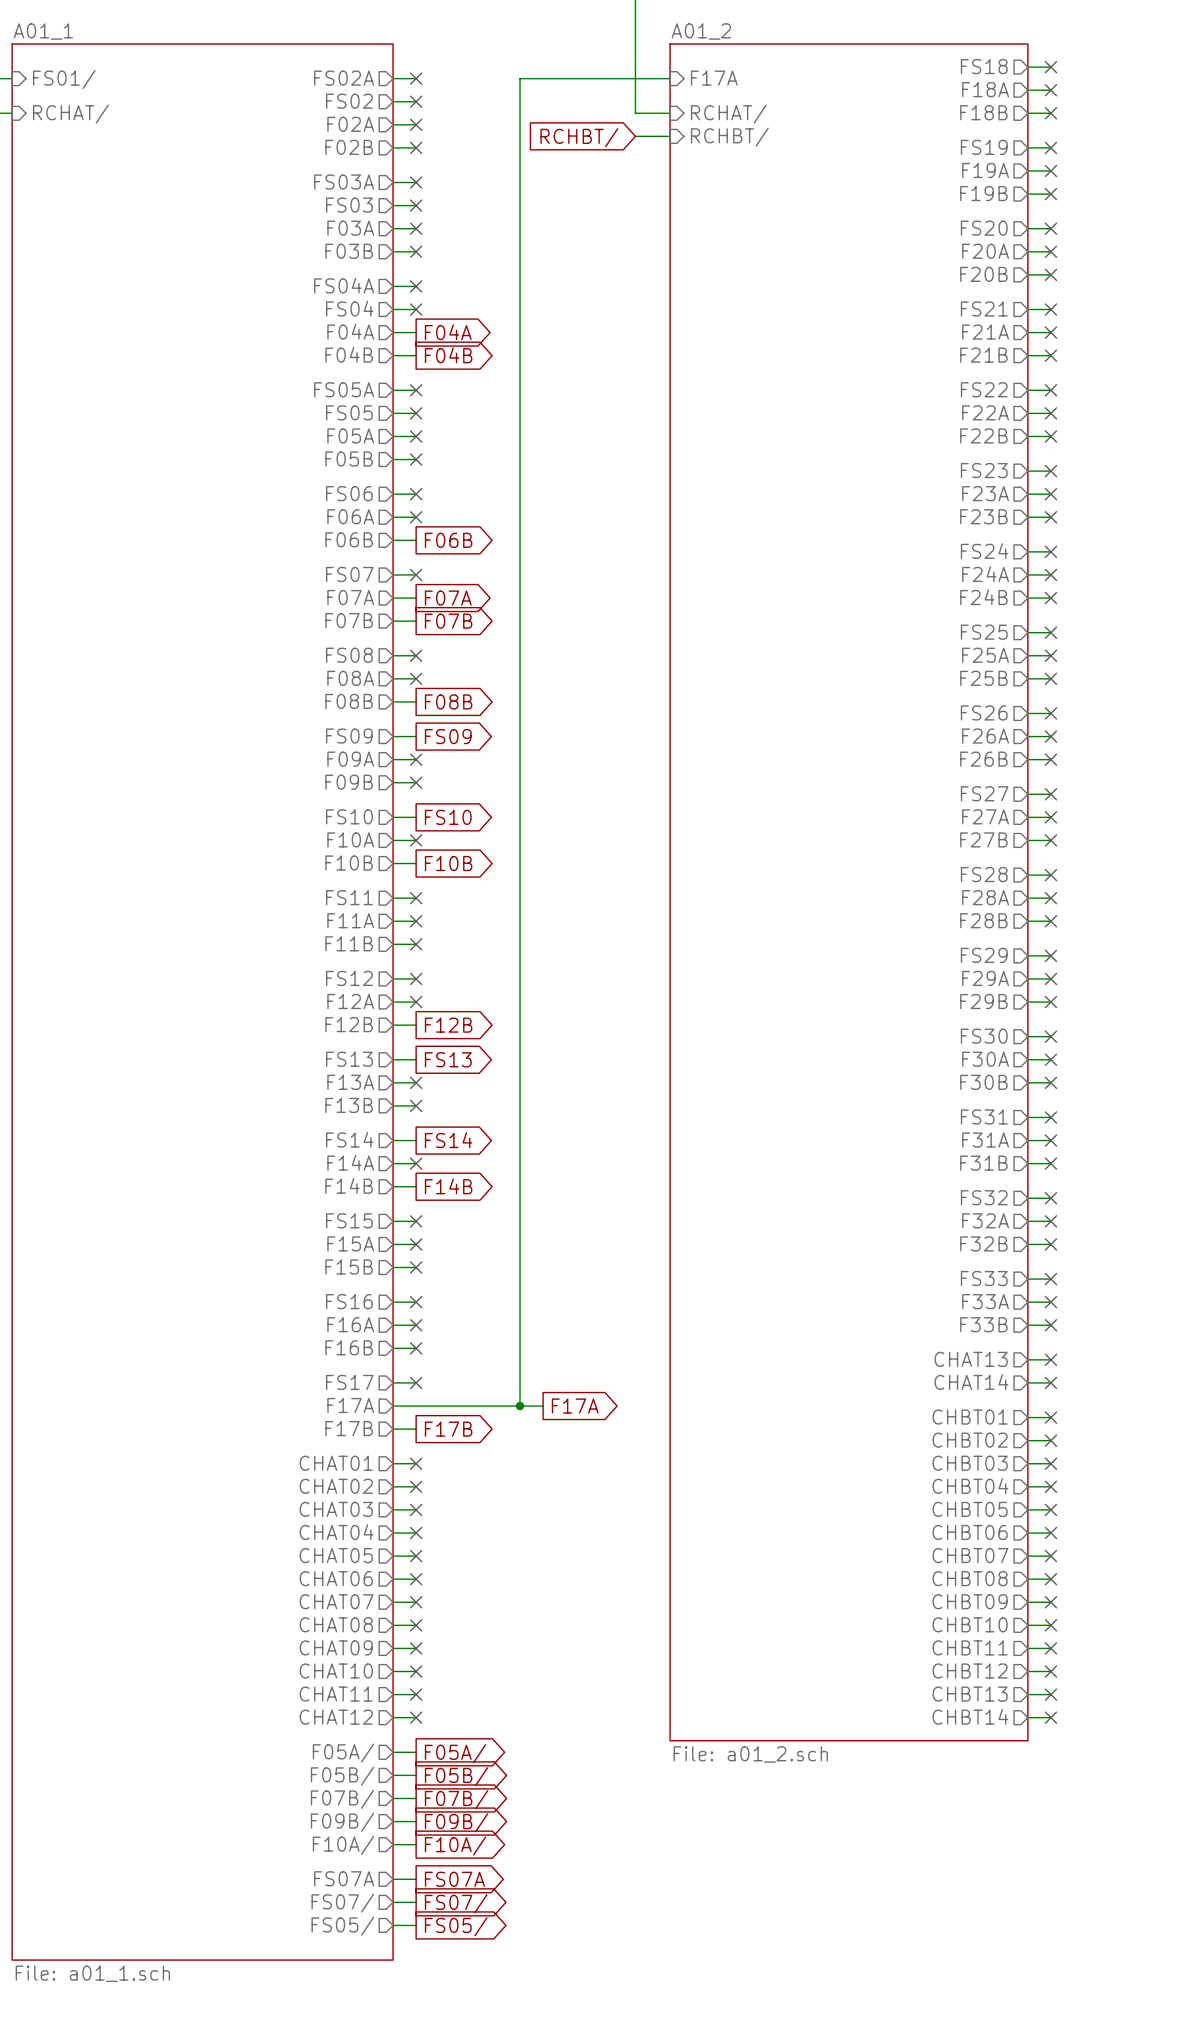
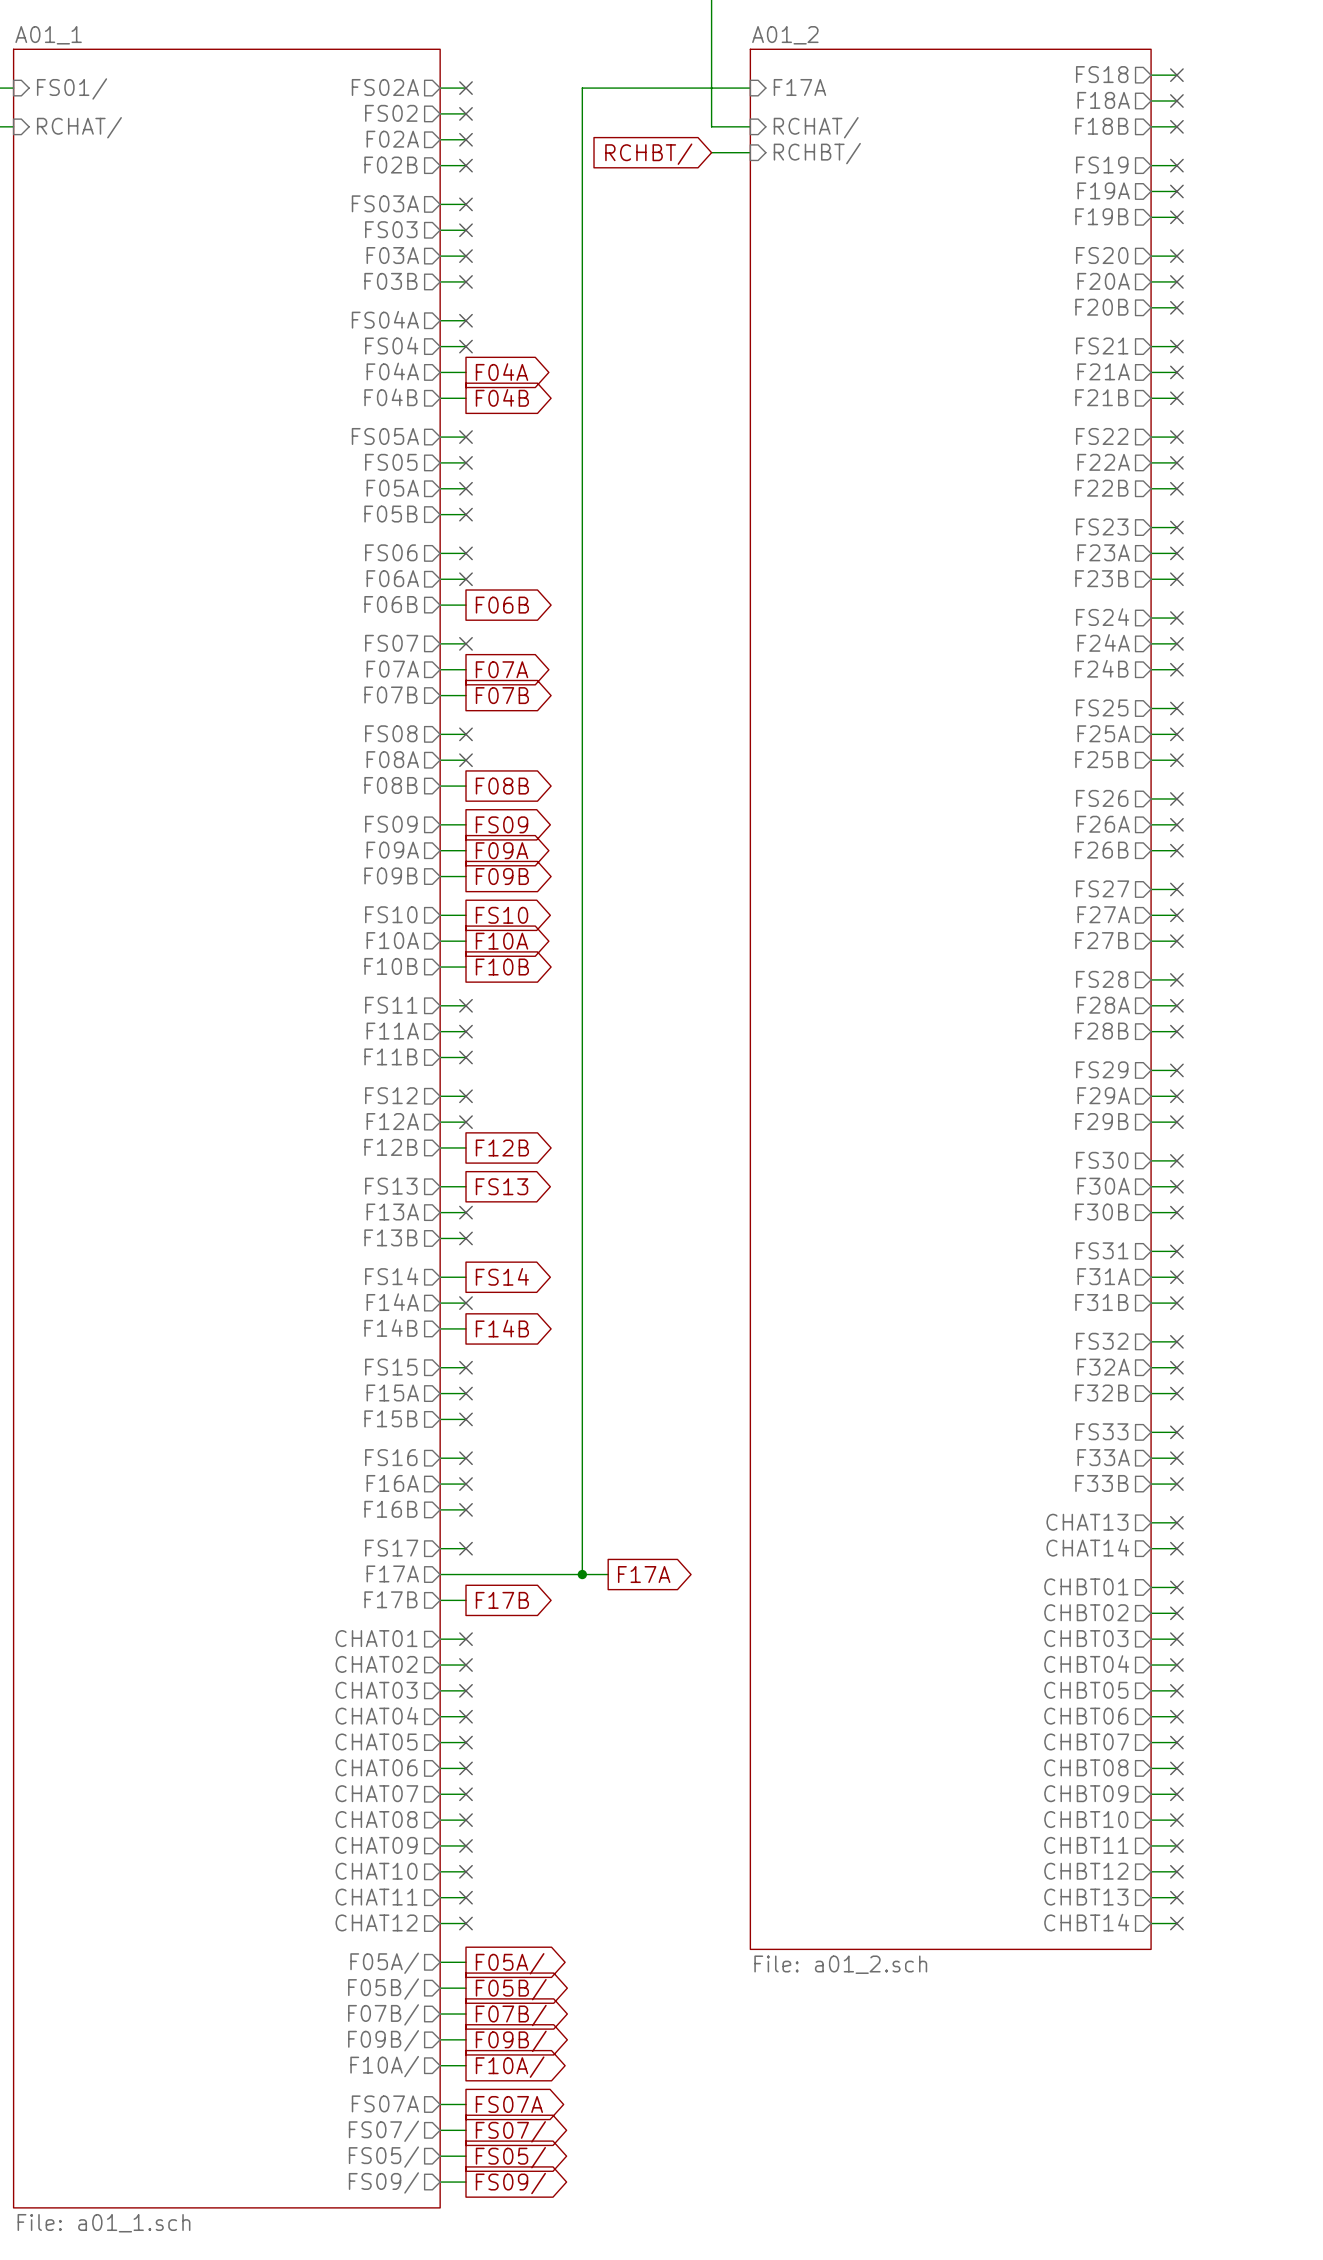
sheet A01_1 shape: [12, 44, 394, 1961] -> [13, 49, 441, 2208]
no-connect mark: (416, 759) -> none
global label: none -> F09A (502, 850)
no-connect mark: (416, 782) -> none
global label: none -> F09B (502, 876)
no-connect mark: (416, 840) -> none
global label: none -> F10A (502, 941)
wire: none -> (440, 2182) (466, 2182)
sheet pin: none -> FS09/ (383, 2182)
global label: none -> FS09/ (510, 2183)

